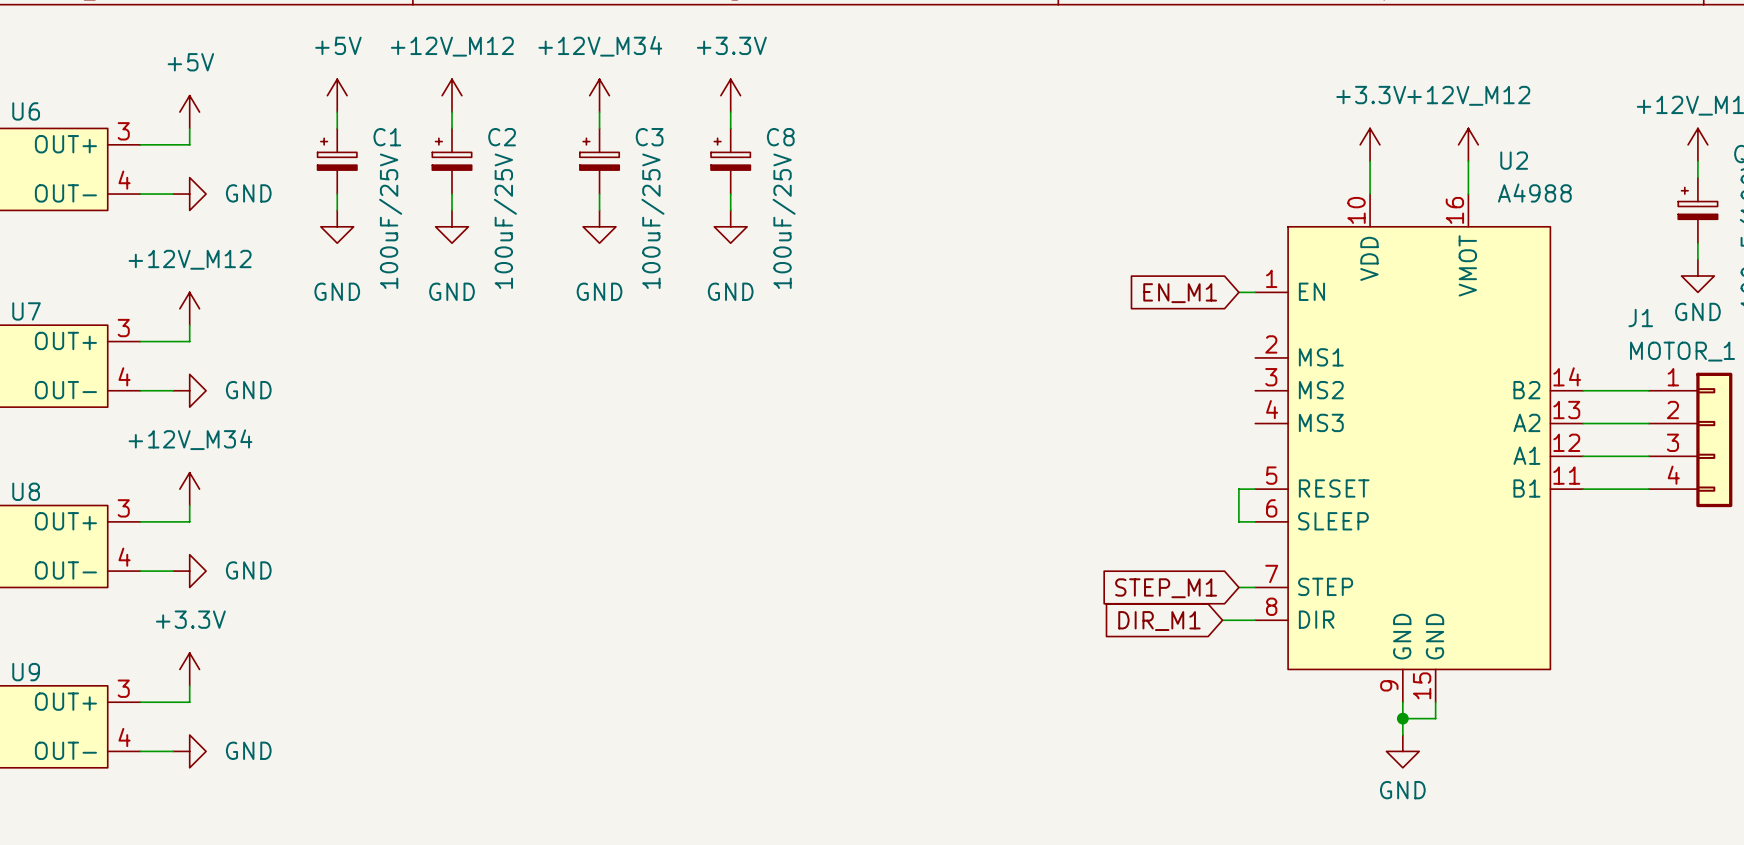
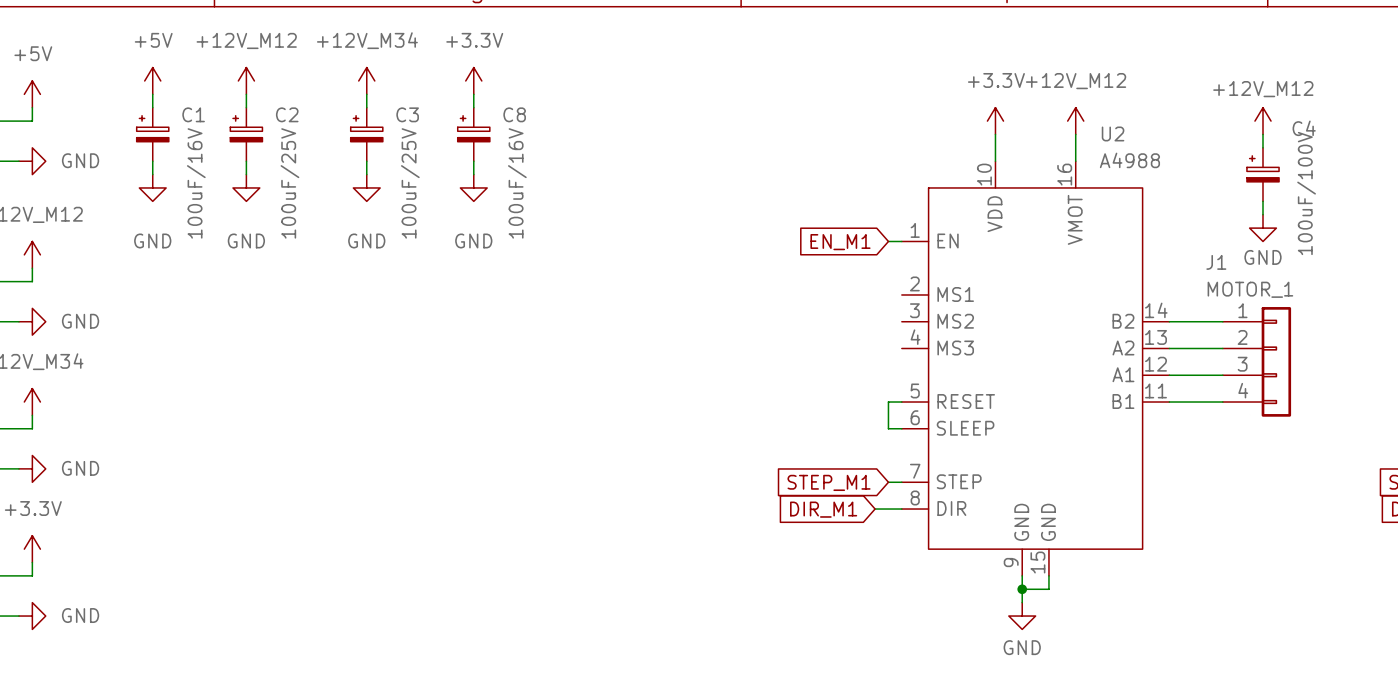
C1 value: 100uF/25V (390, 221) -> 100uF/16V (196, 183)
C8 value: 100uF/25V (784, 221) -> 100uF/16V (517, 183)

